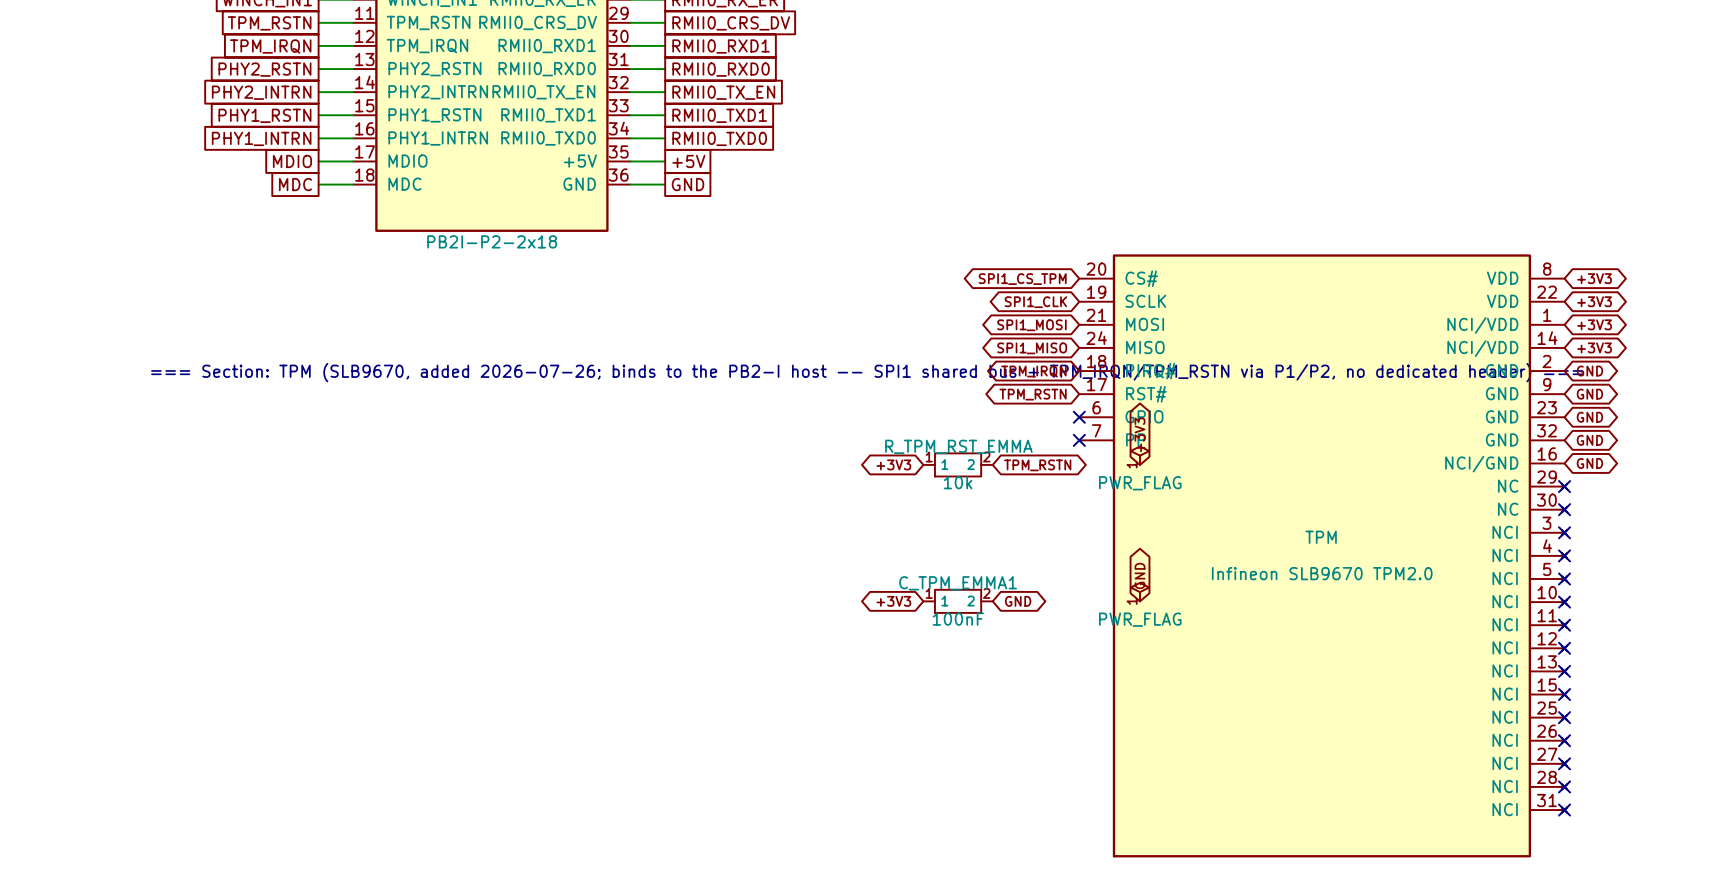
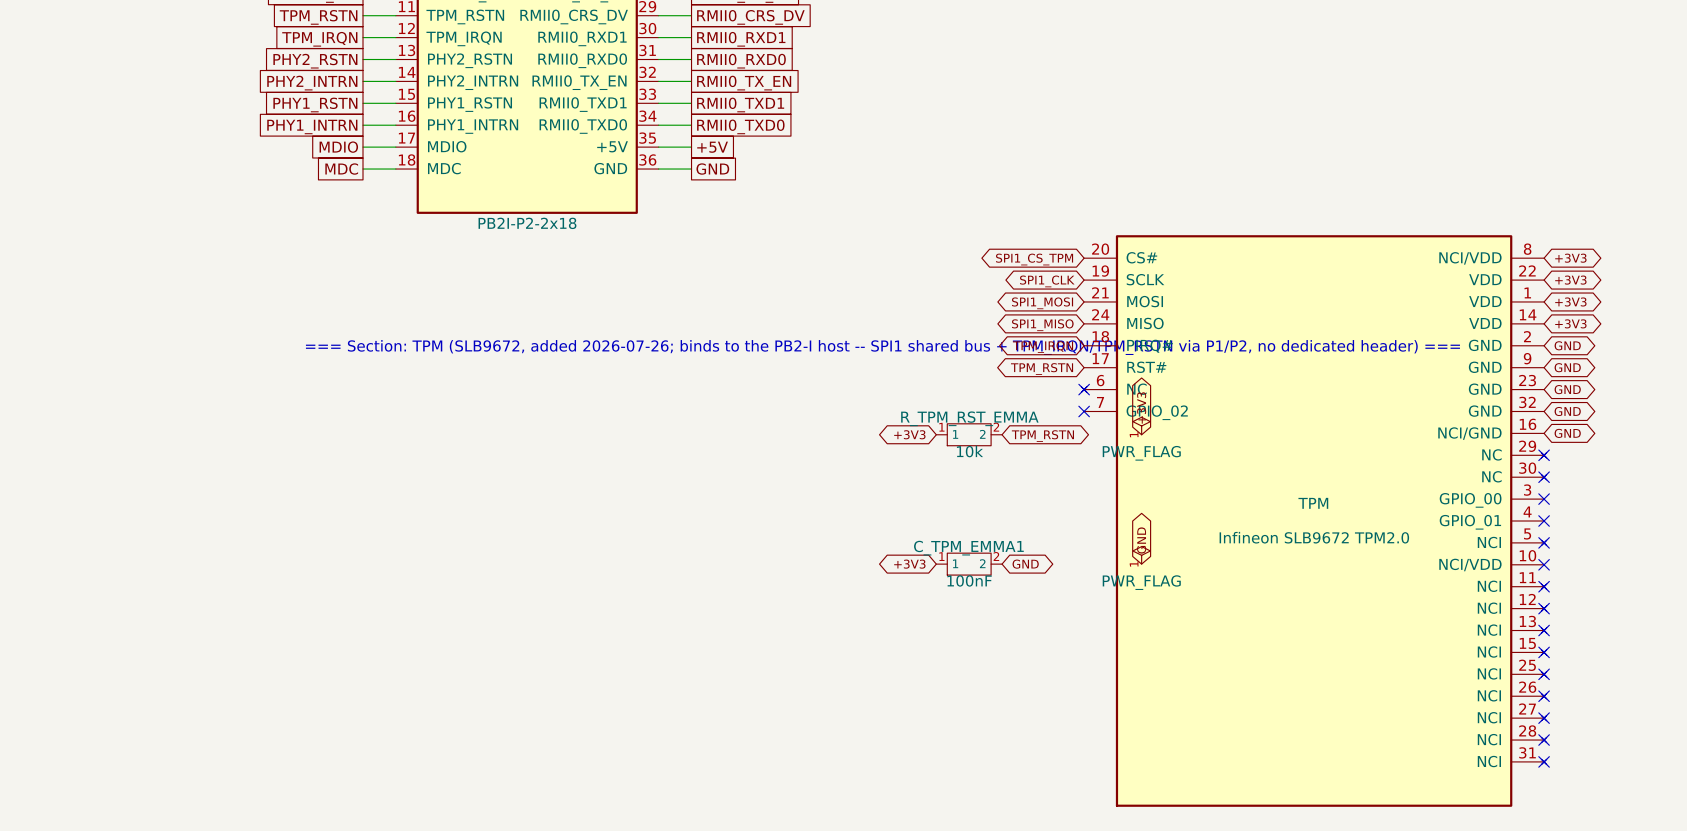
TPM symbol: [1079, 254, 1568, 858] -> [1081, 235, 1547, 807]
text: === Section: TPM (SLB9670, added 2026-07-26; binds to the PB2-I host -- SPI1 shared bus + TPM_IRQN/TPM_RSTN via P1/P2, no dedicated header) === (867, 372) -> === Section: TPM (SLB9672, added 2026-07-26; binds to the PB2-I host -- SPI1 shared bus + TPM_IRQN/TPM_RSTN via P1/P2, no dedicated header) === (882, 347)
TPM value: Infineon SLB9670 TPM2.0 (1322, 573) -> Infineon SLB9672 TPM2.0 (1314, 537)

